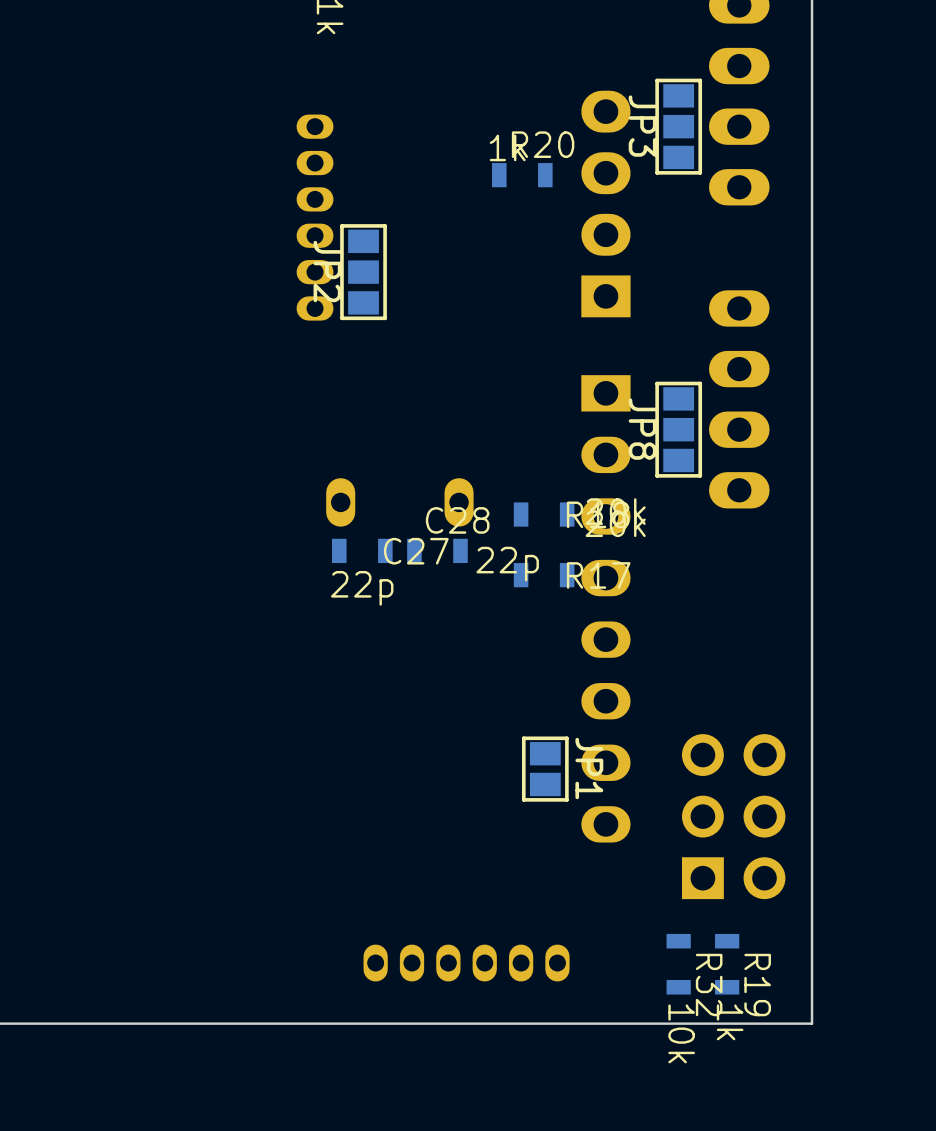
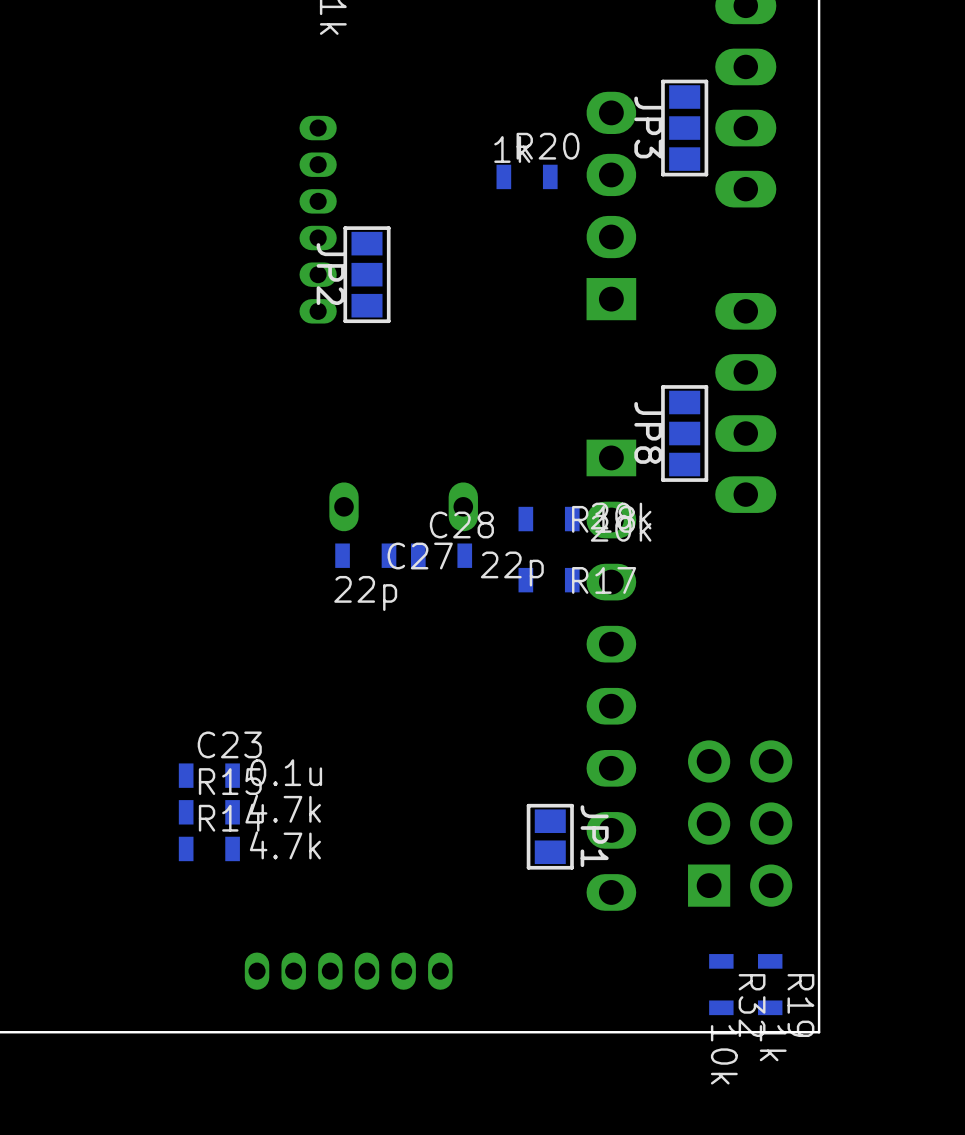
part position: (605, 608) -> (611, 675)
C23: none -> 0.1u (209, 775)
JP1 position: (545, 769) -> (550, 836)
R15: none -> 4.7k (209, 812)
R14: none -> 4.7k (209, 848)
part position: (466, 963) -> (348, 971)
R32 position: (678, 964) -> (721, 984)
R19 position: (727, 964) -> (770, 984)

